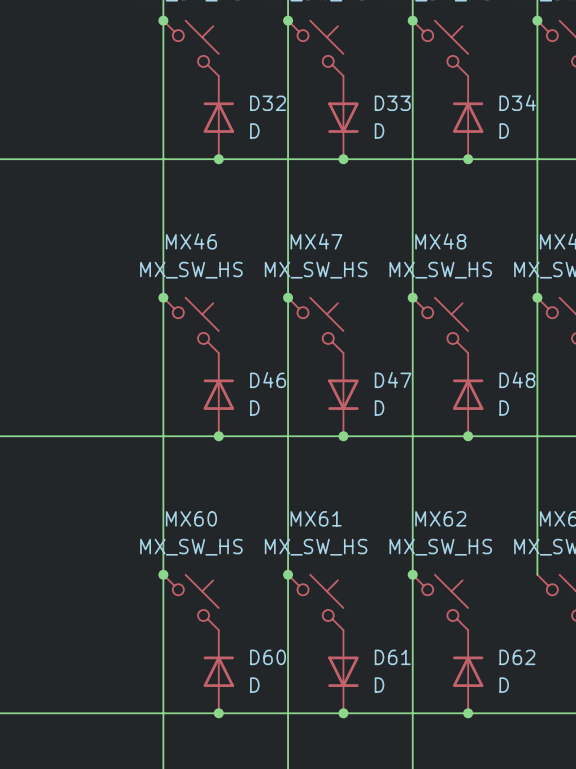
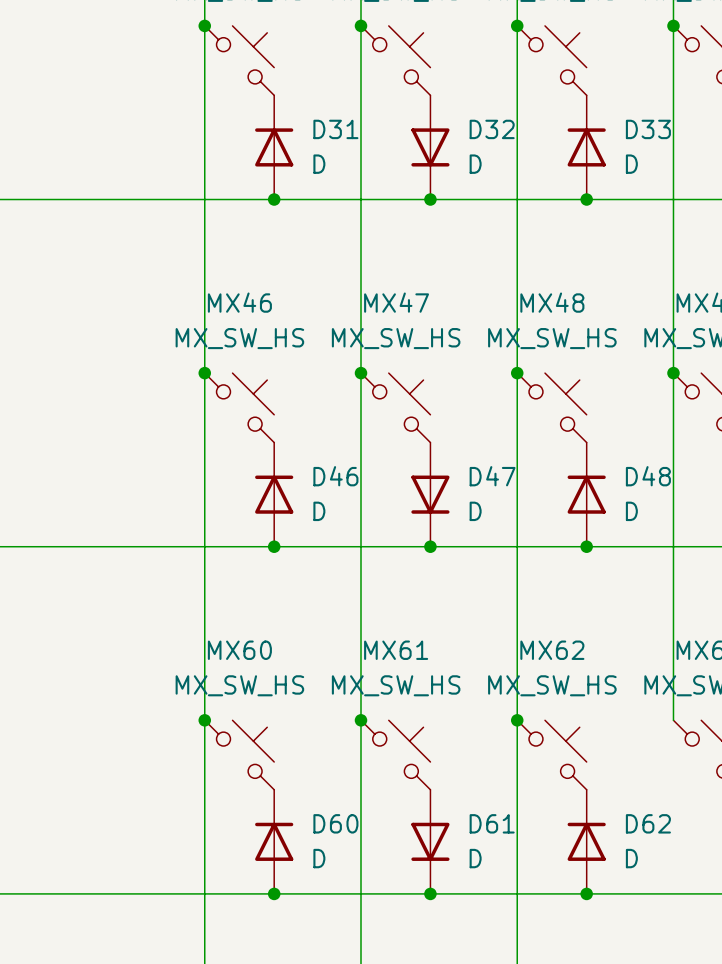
D34 name: D34 (517, 102) -> D33 (648, 129)
D32 name: D32 (268, 103) -> D31 (335, 129)
D33 name: D33 (392, 103) -> D32 (492, 129)

